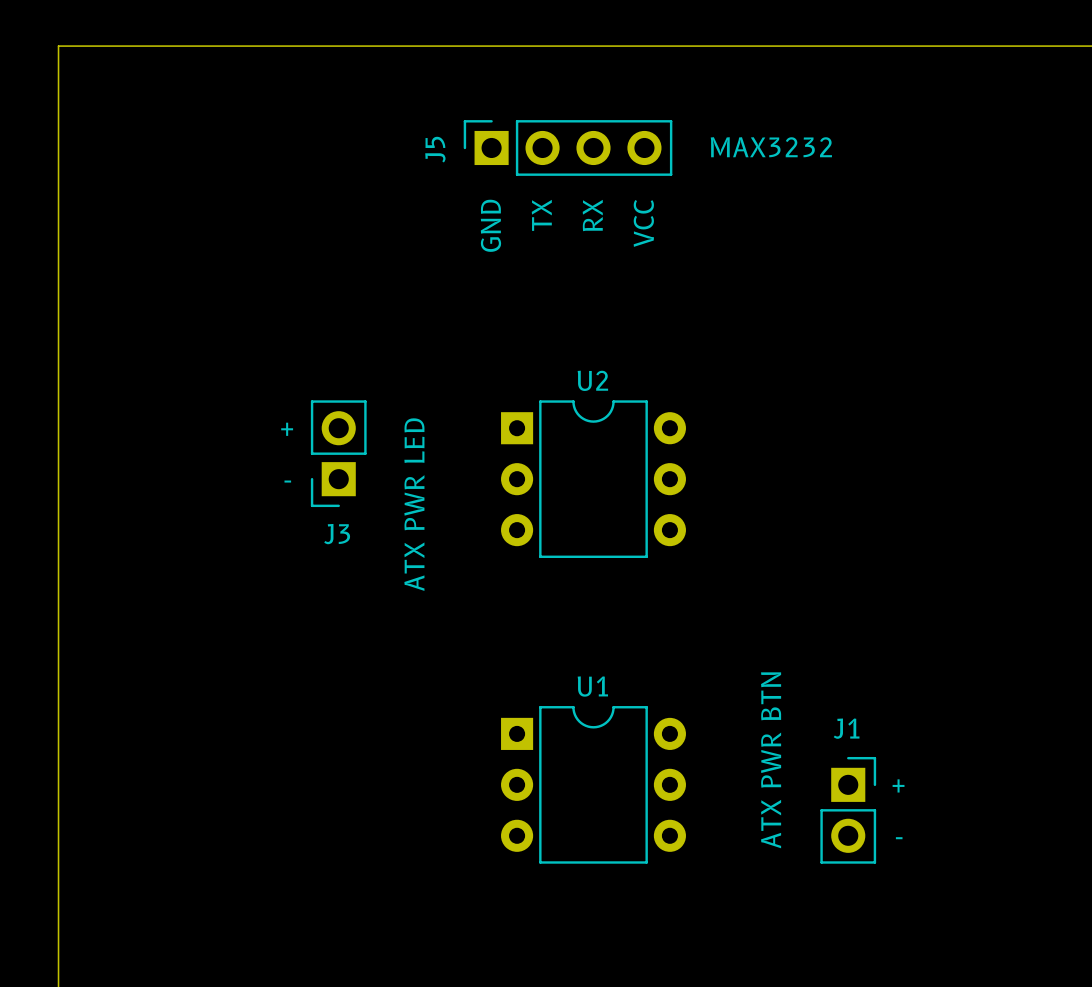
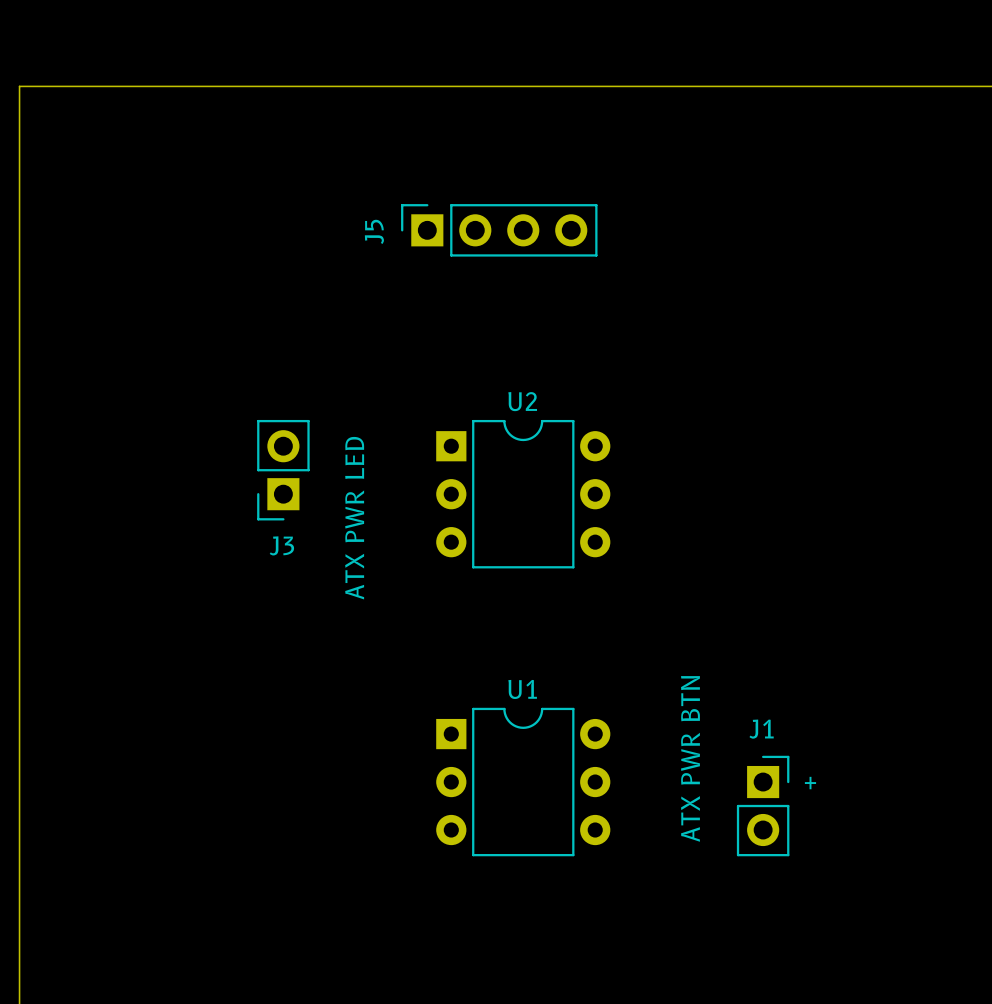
J5 position: (568, 147) -> (499, 230)
text: MAX3232 (771, 147) -> none
text: TX (541, 215) -> none
text: RX (592, 215) -> none
text: VCC (643, 223) -> none
text: GND (490, 225) -> none
text: + (287, 429) -> none
text: - (287, 481) -> none
text: - (899, 838) -> none

